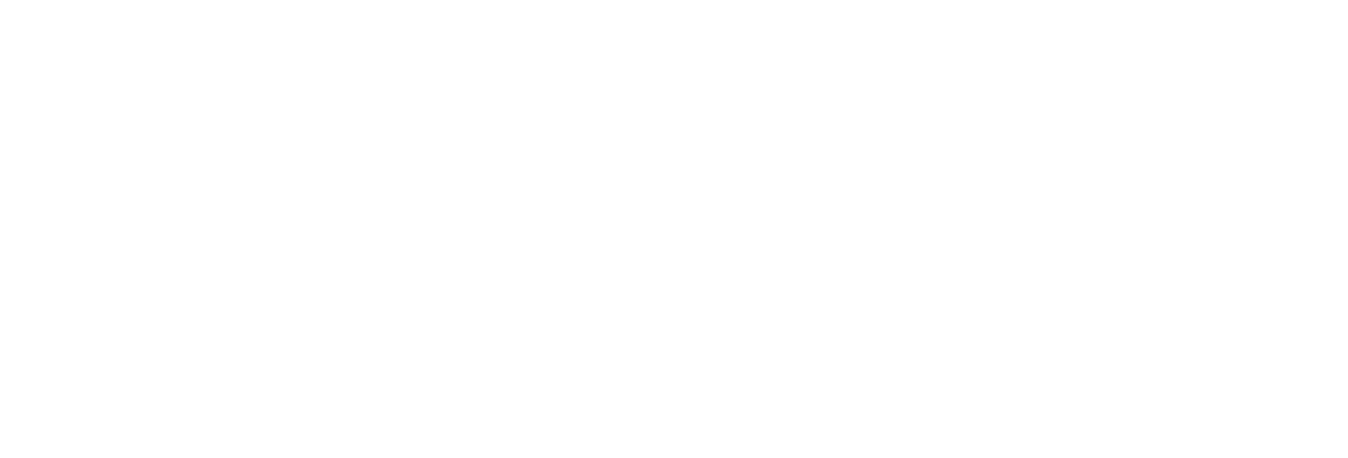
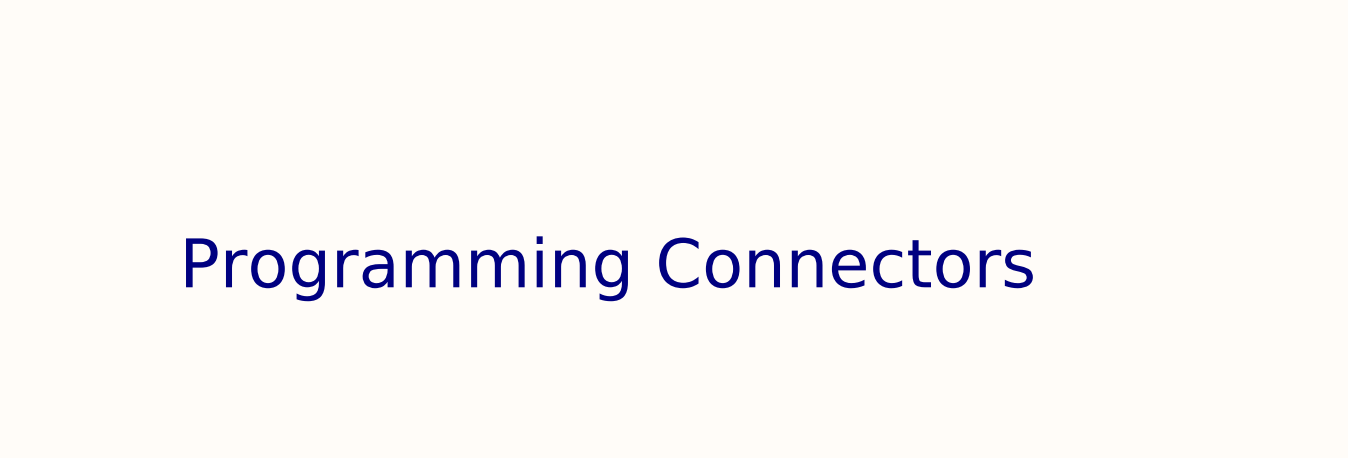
text: none -> Programming Connectors (609, 268)

